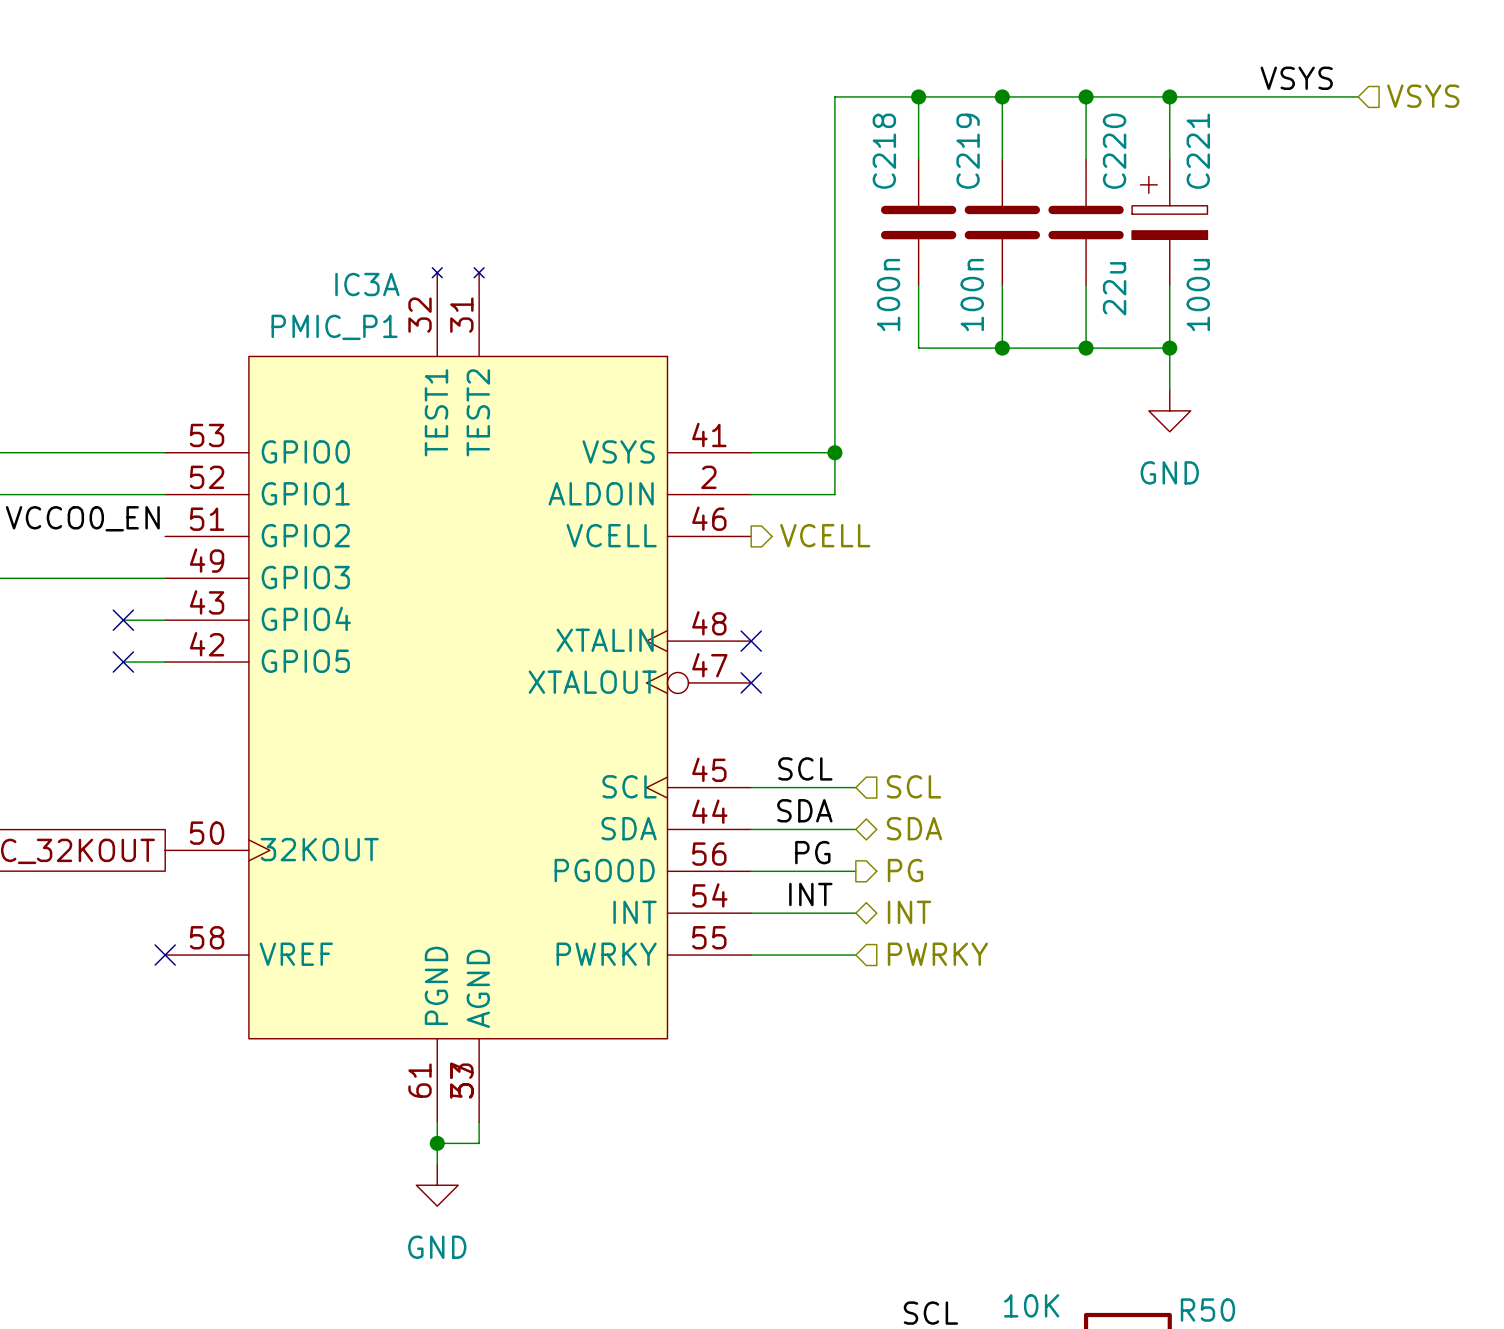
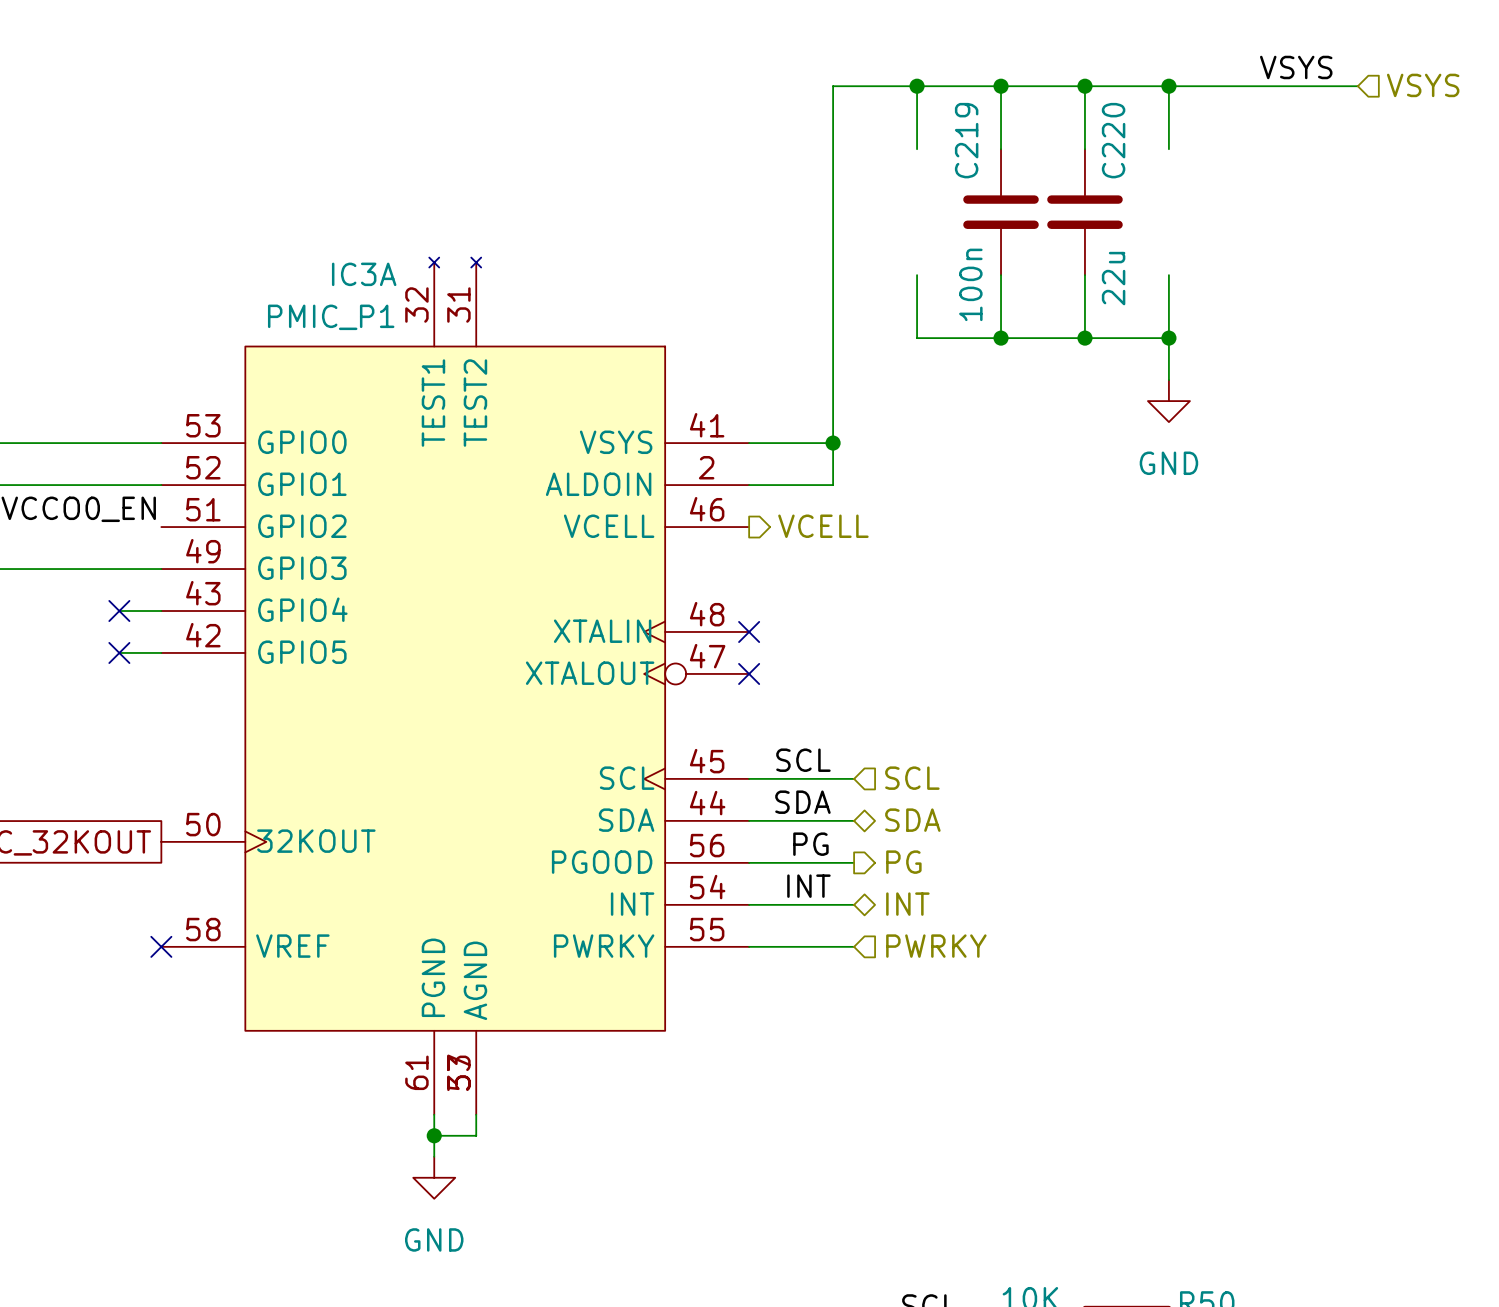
C218: 100n (918, 222) -> none
C221: 100u (1169, 222) -> none

